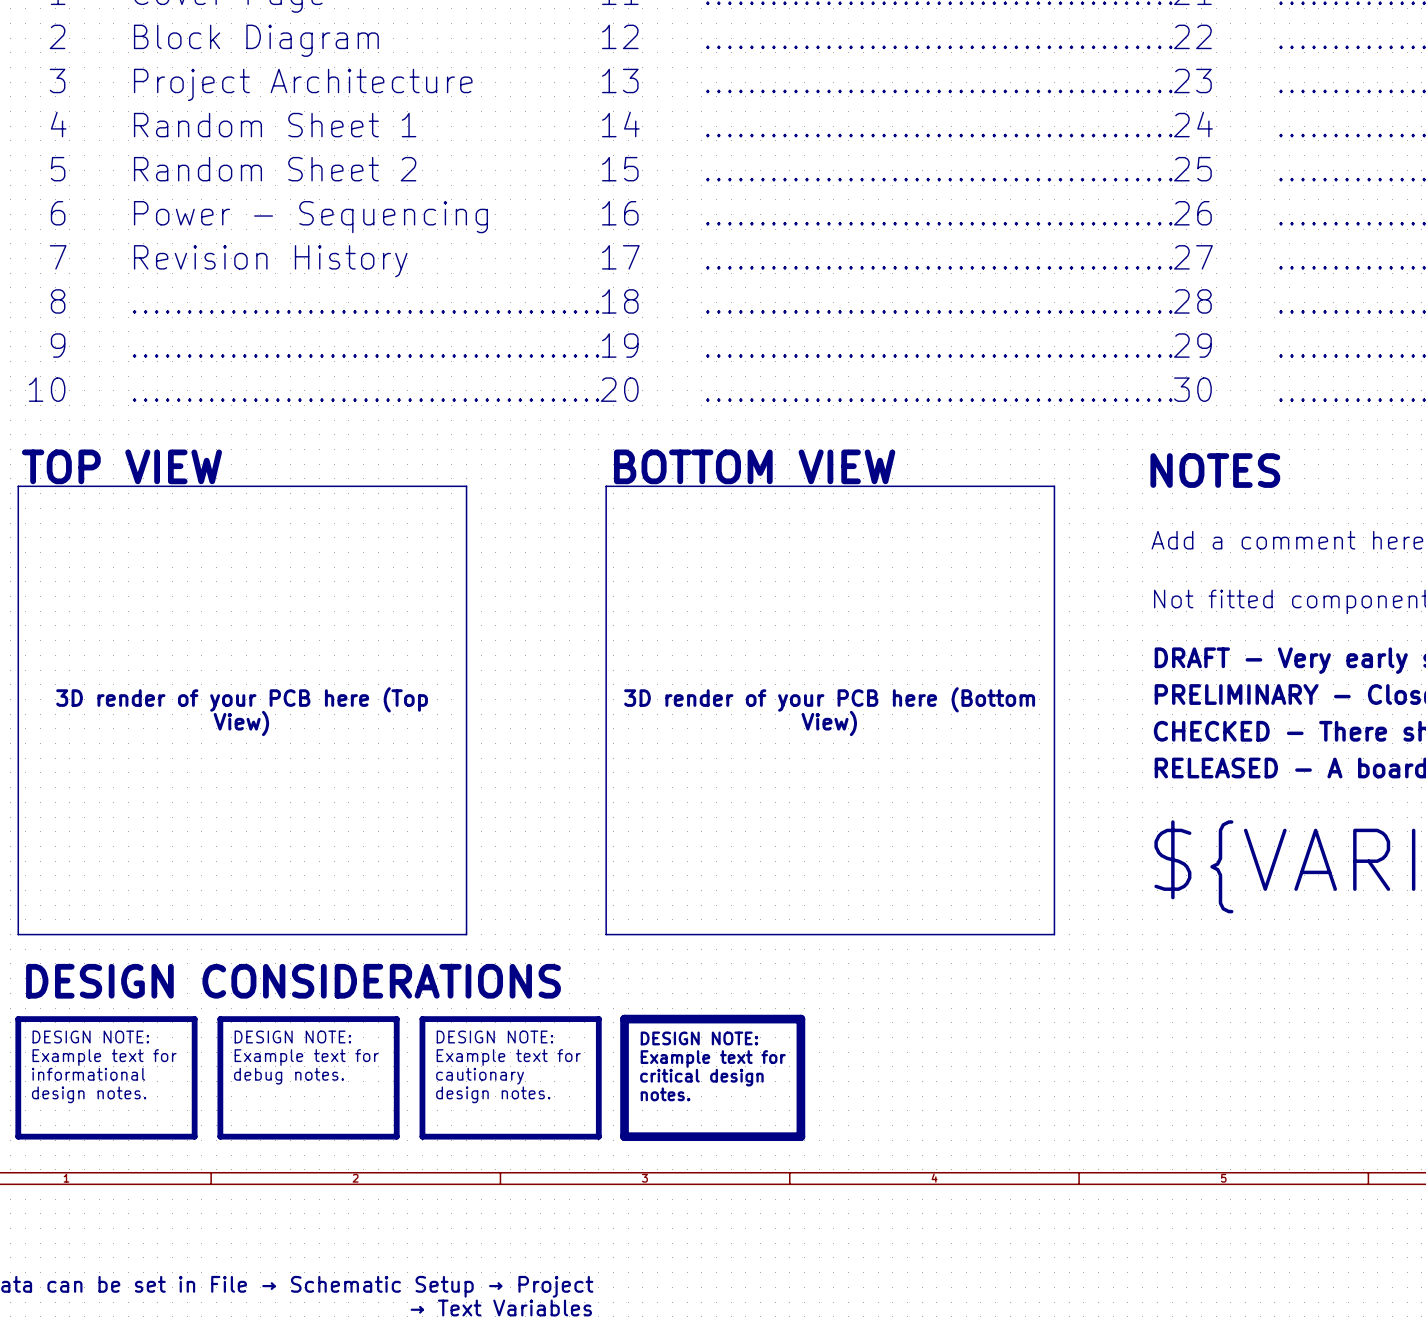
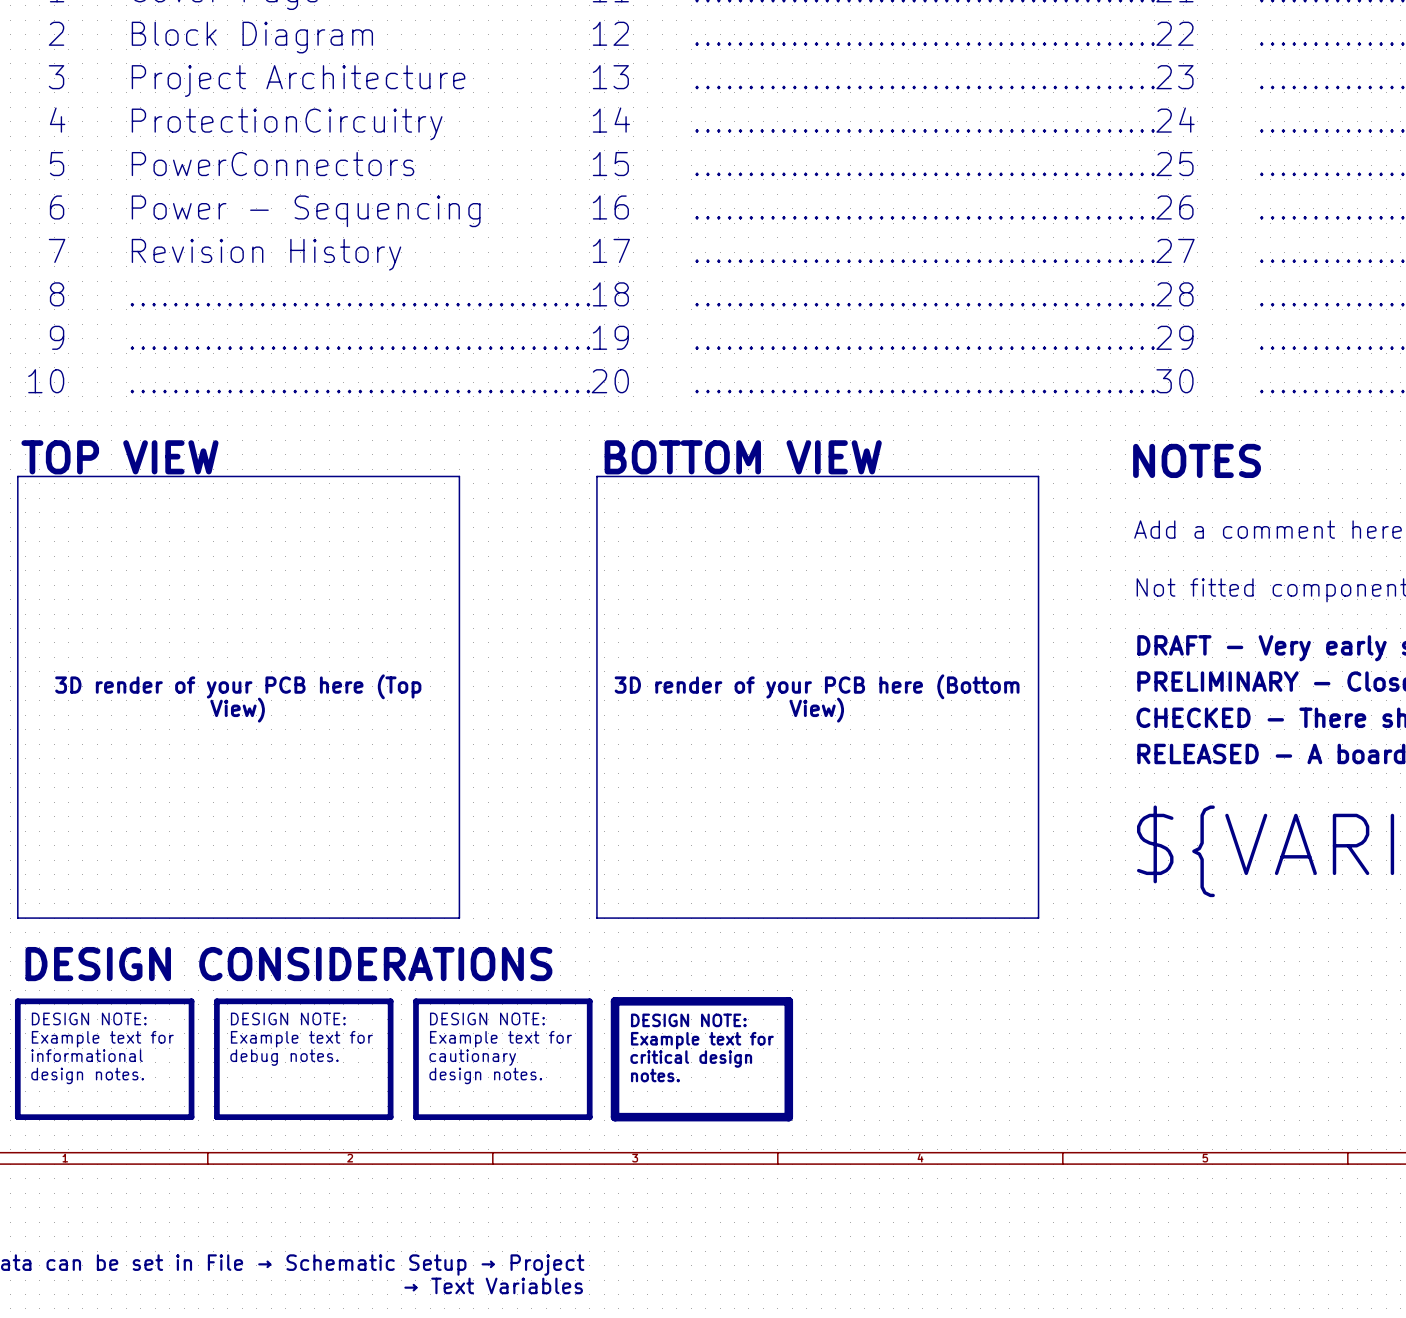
text: Random Sheet 1 (275, 125) -> ProtectionCircuitry (287, 124)
text: Random Sheet 2 (275, 169) -> PowerConnectors (273, 164)

